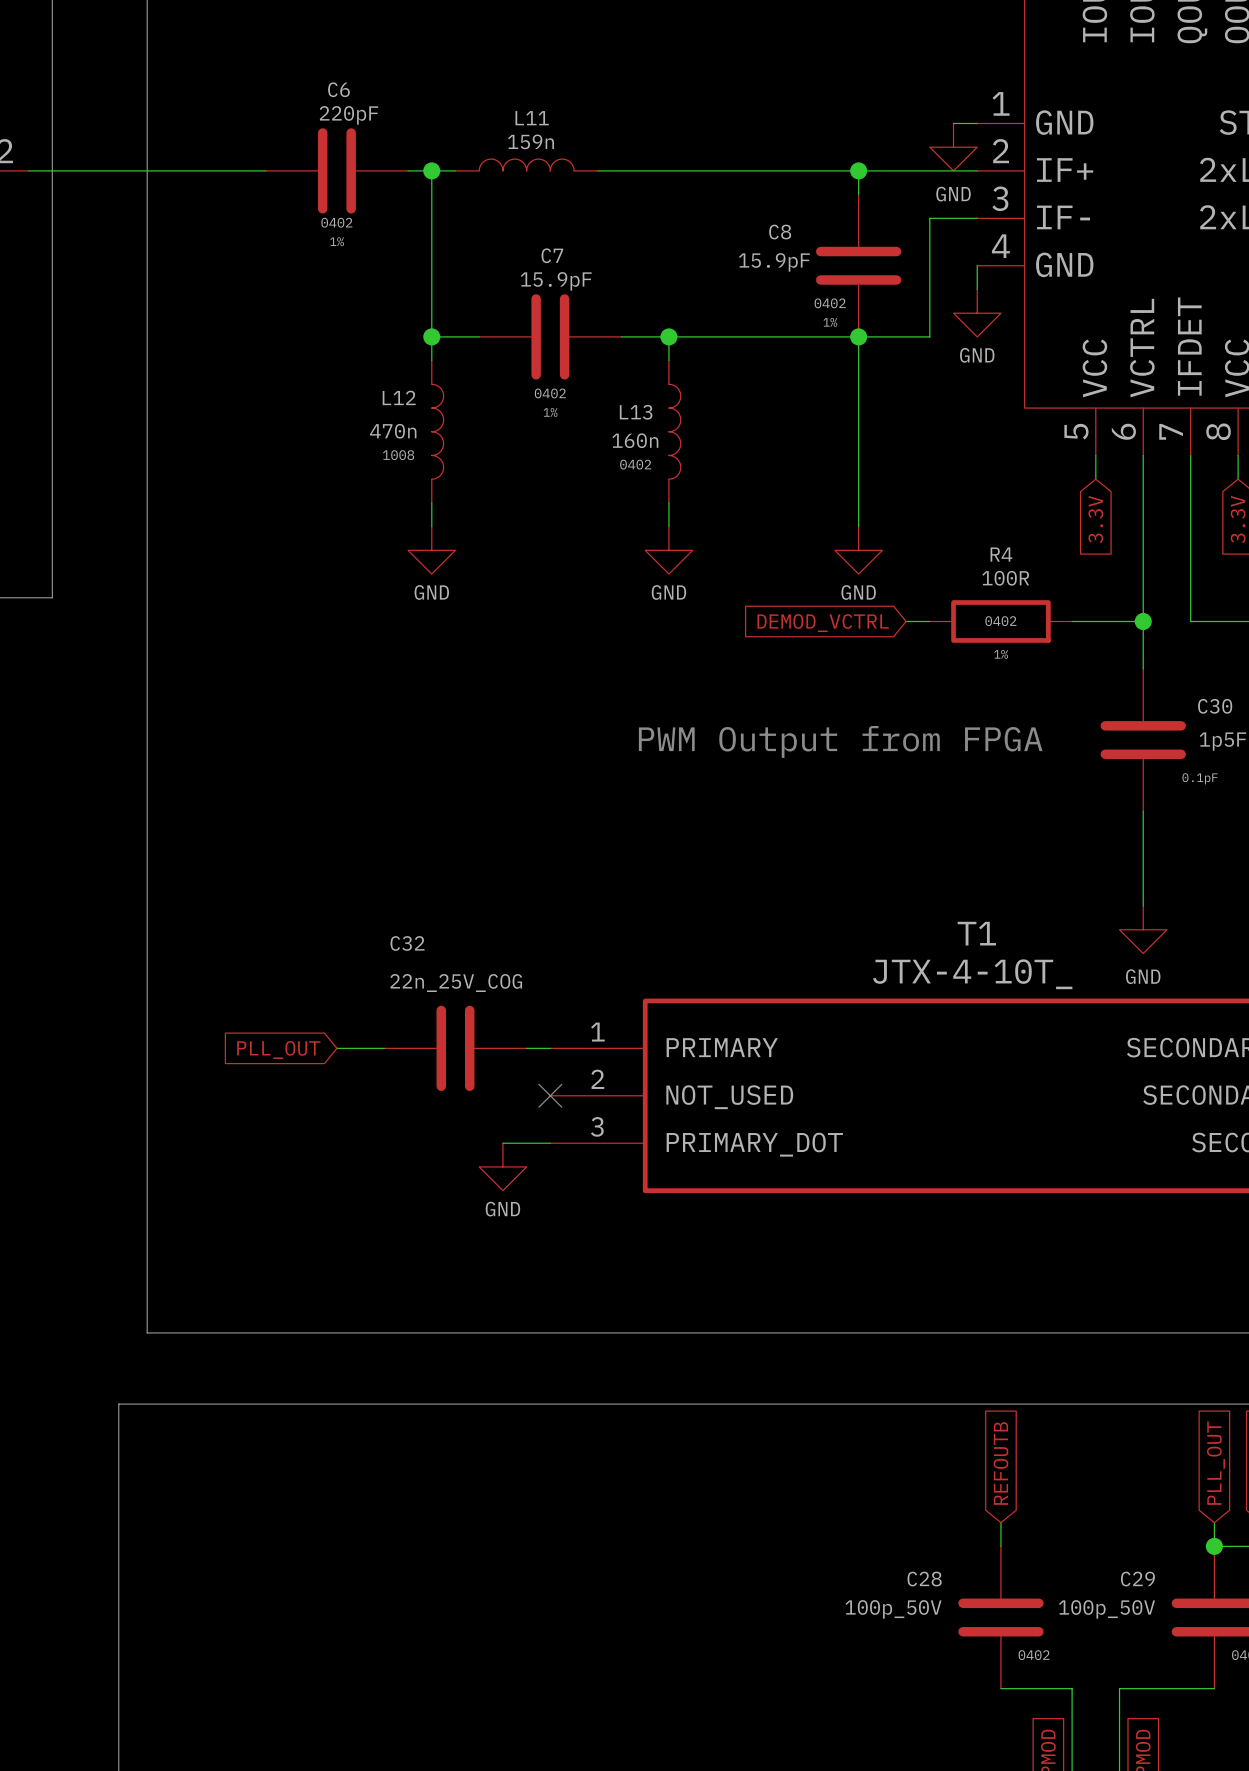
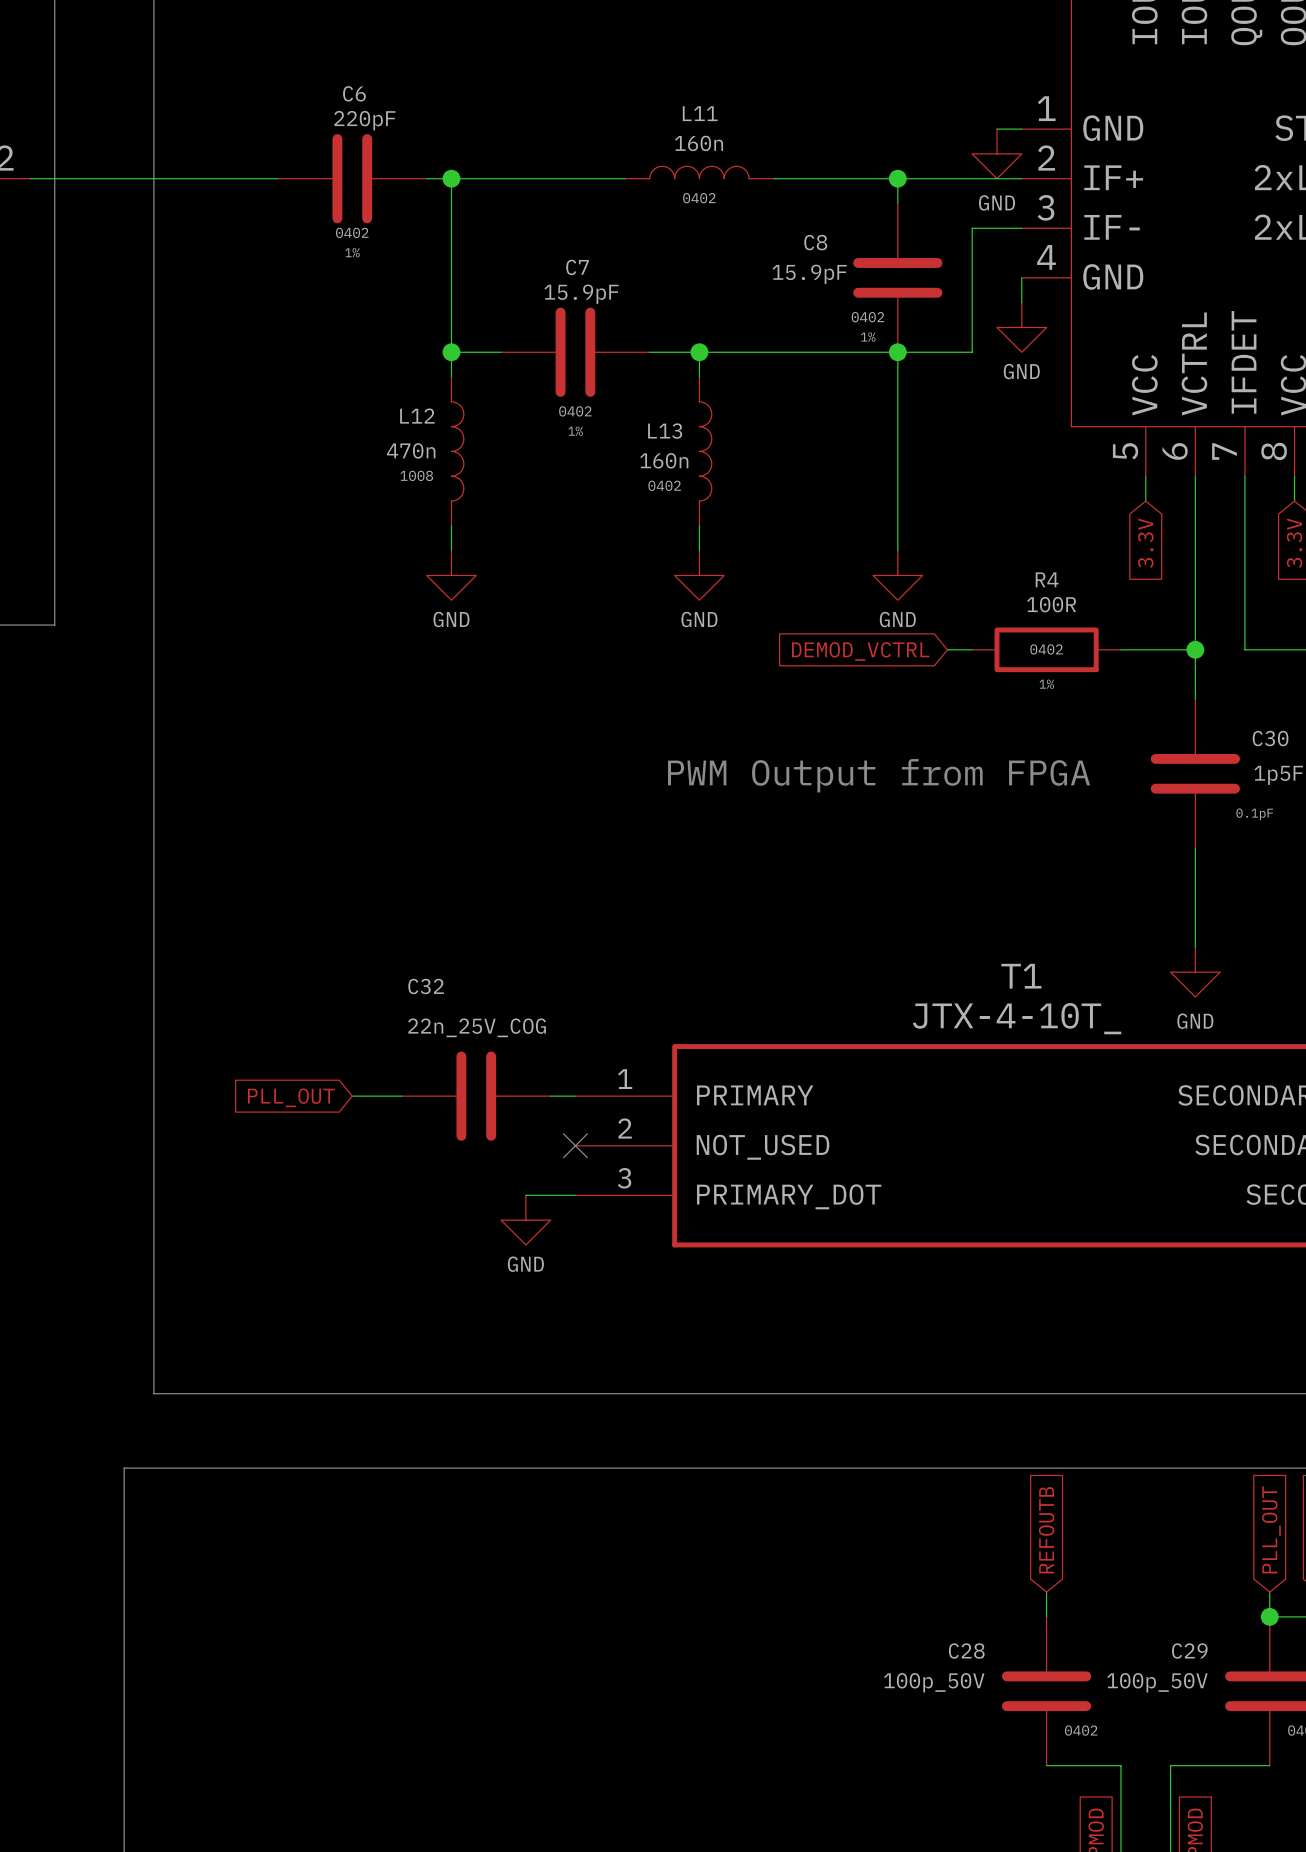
L11 name position: L11 (532, 118) -> L11 (700, 113)
L11 value: 159n (531, 141) -> 160n (699, 143)
L11 position: (526, 165) -> (699, 172)
wire: (597, 170) (740, 170) -> (625, 178) (476, 178)
L11 text: none -> 0402 (699, 198)

